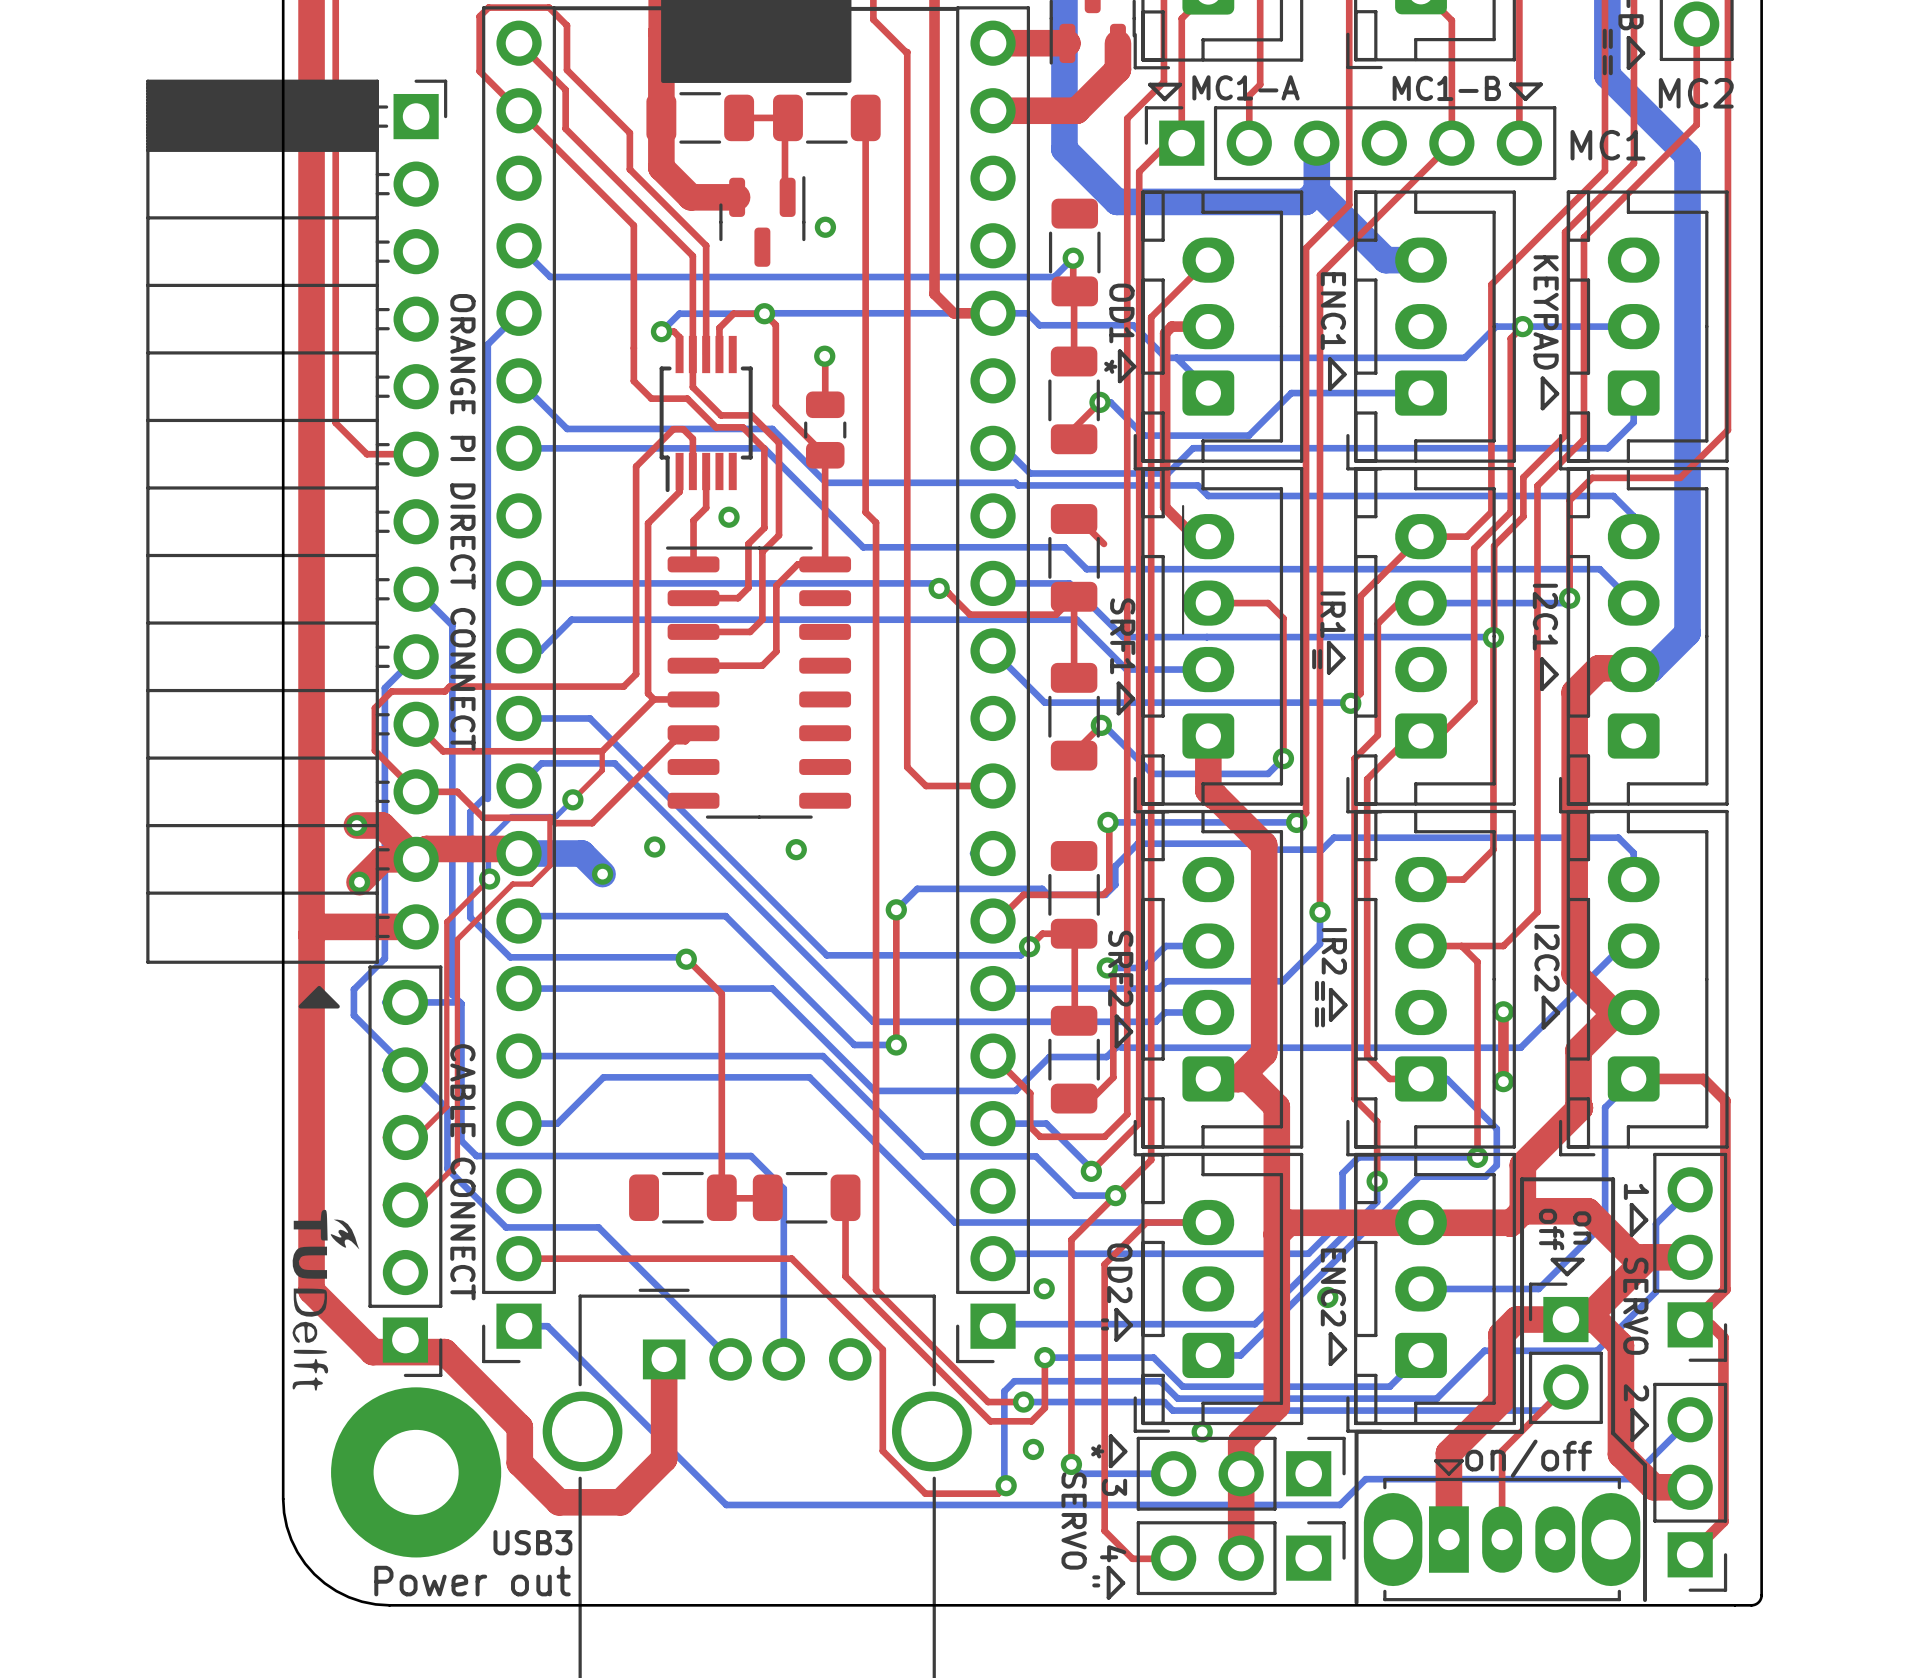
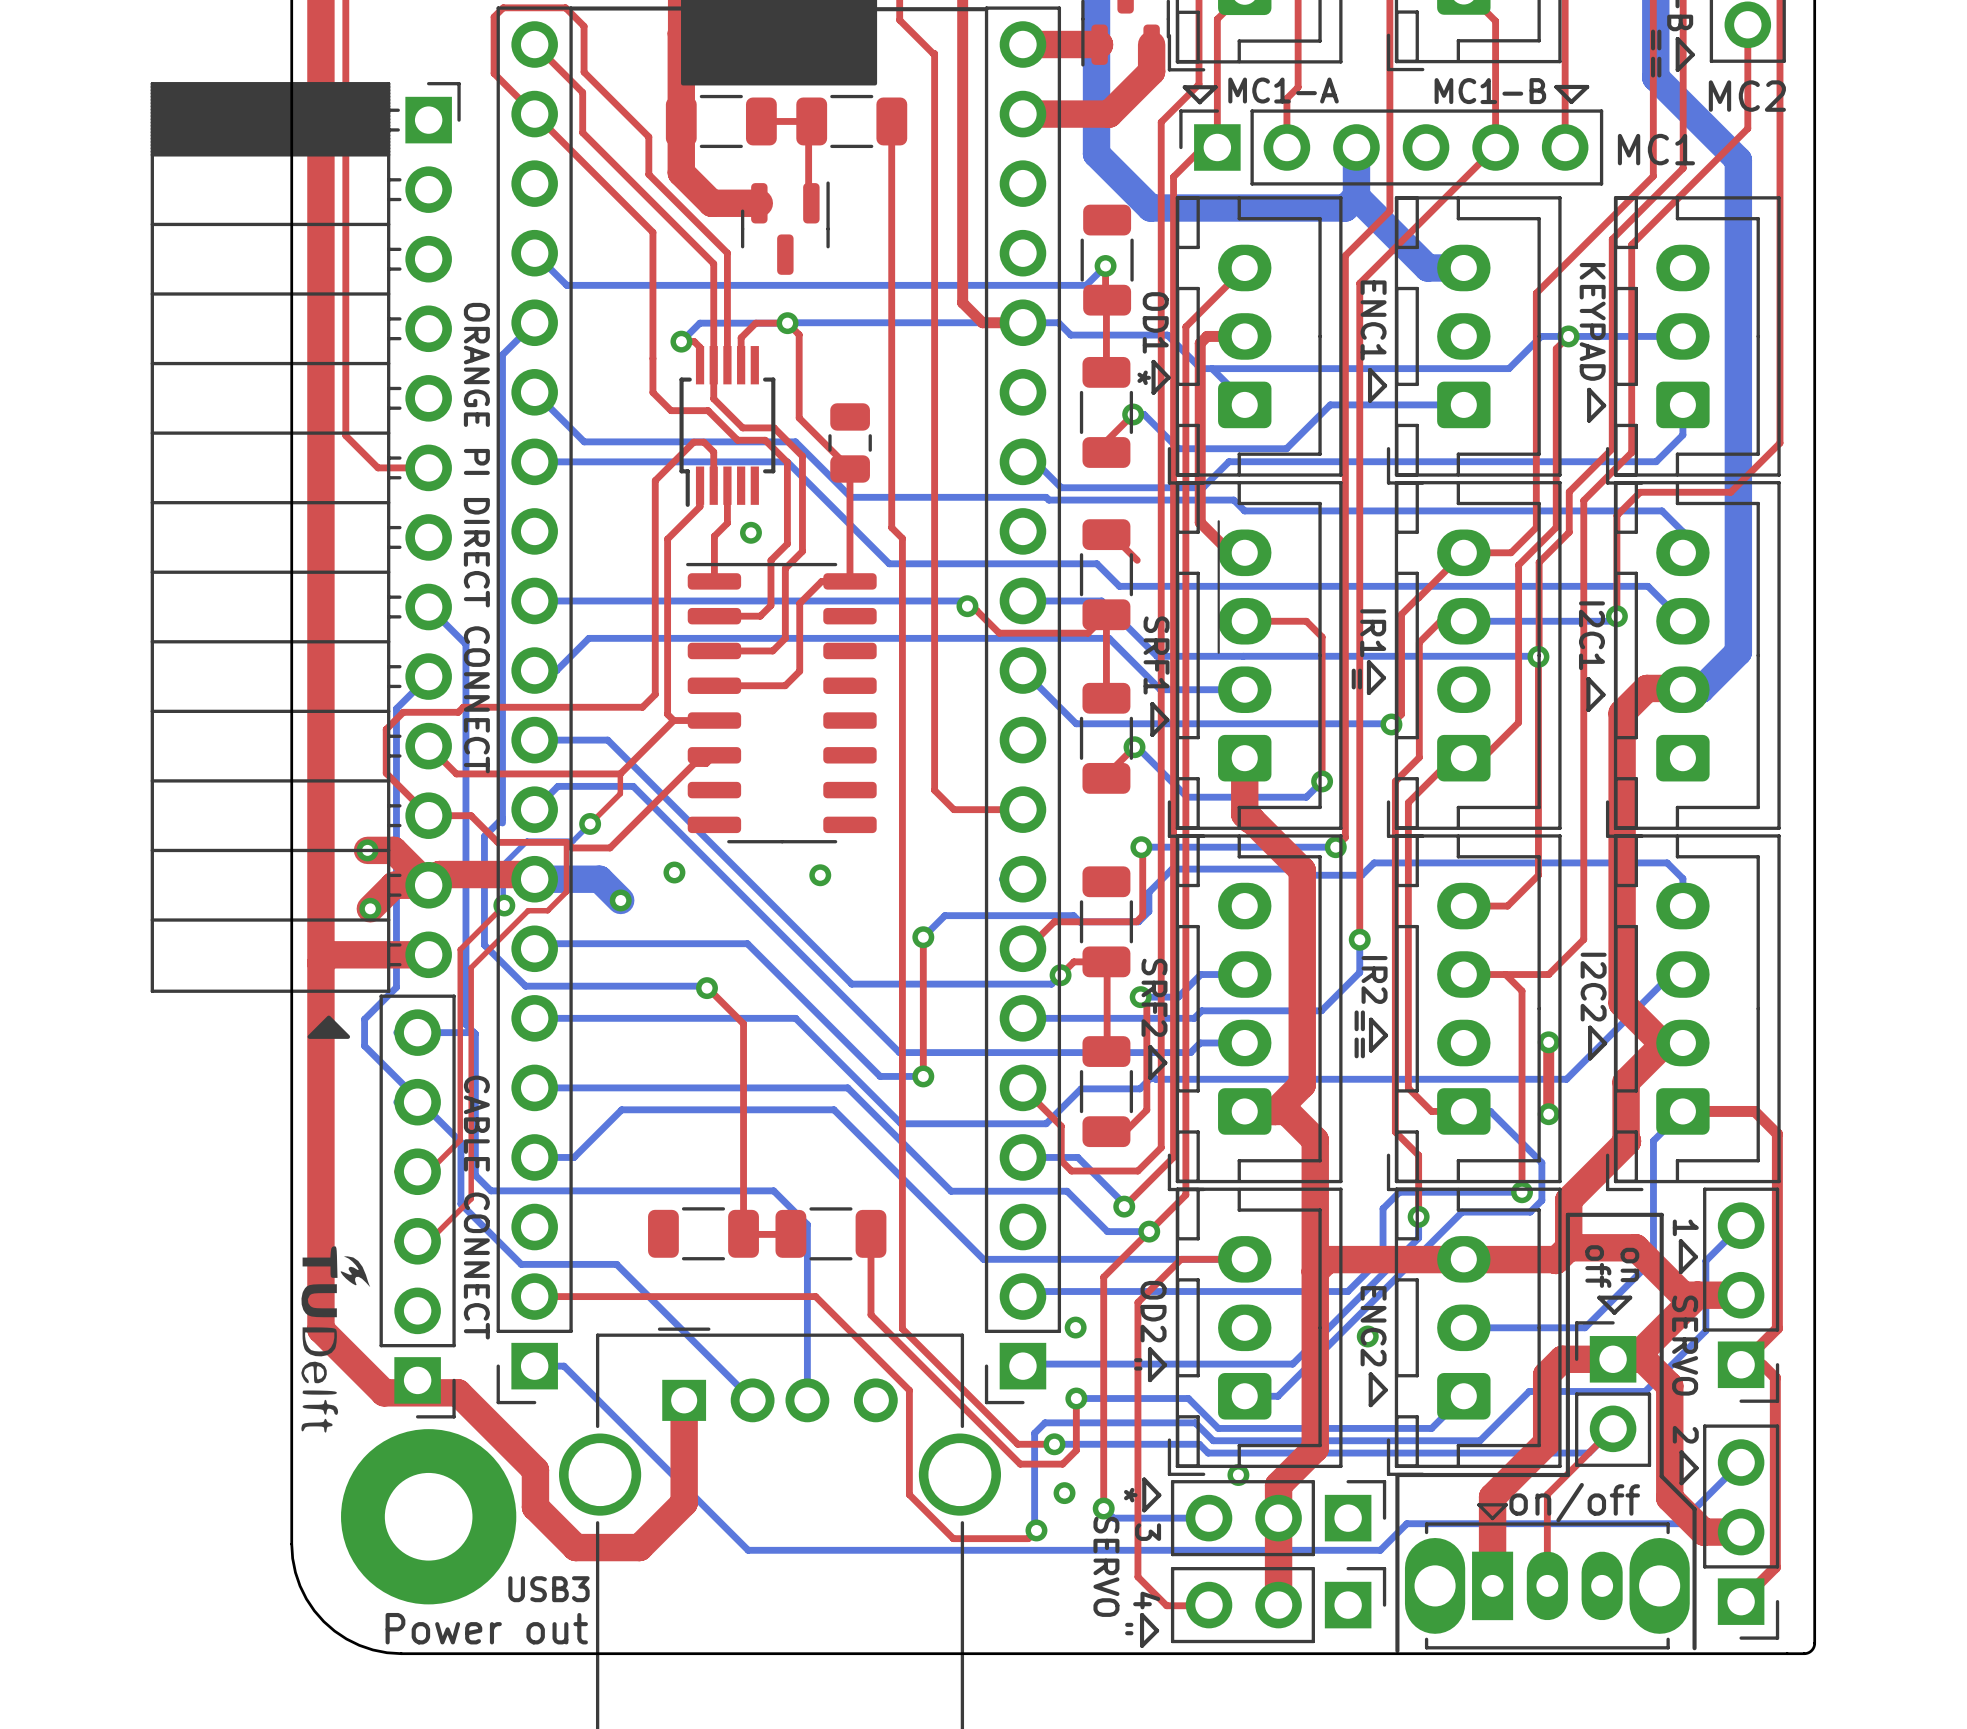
via: (825, 227) -> none
top track: (824, 356) (825, 404) -> none
via: (824, 356) -> none

